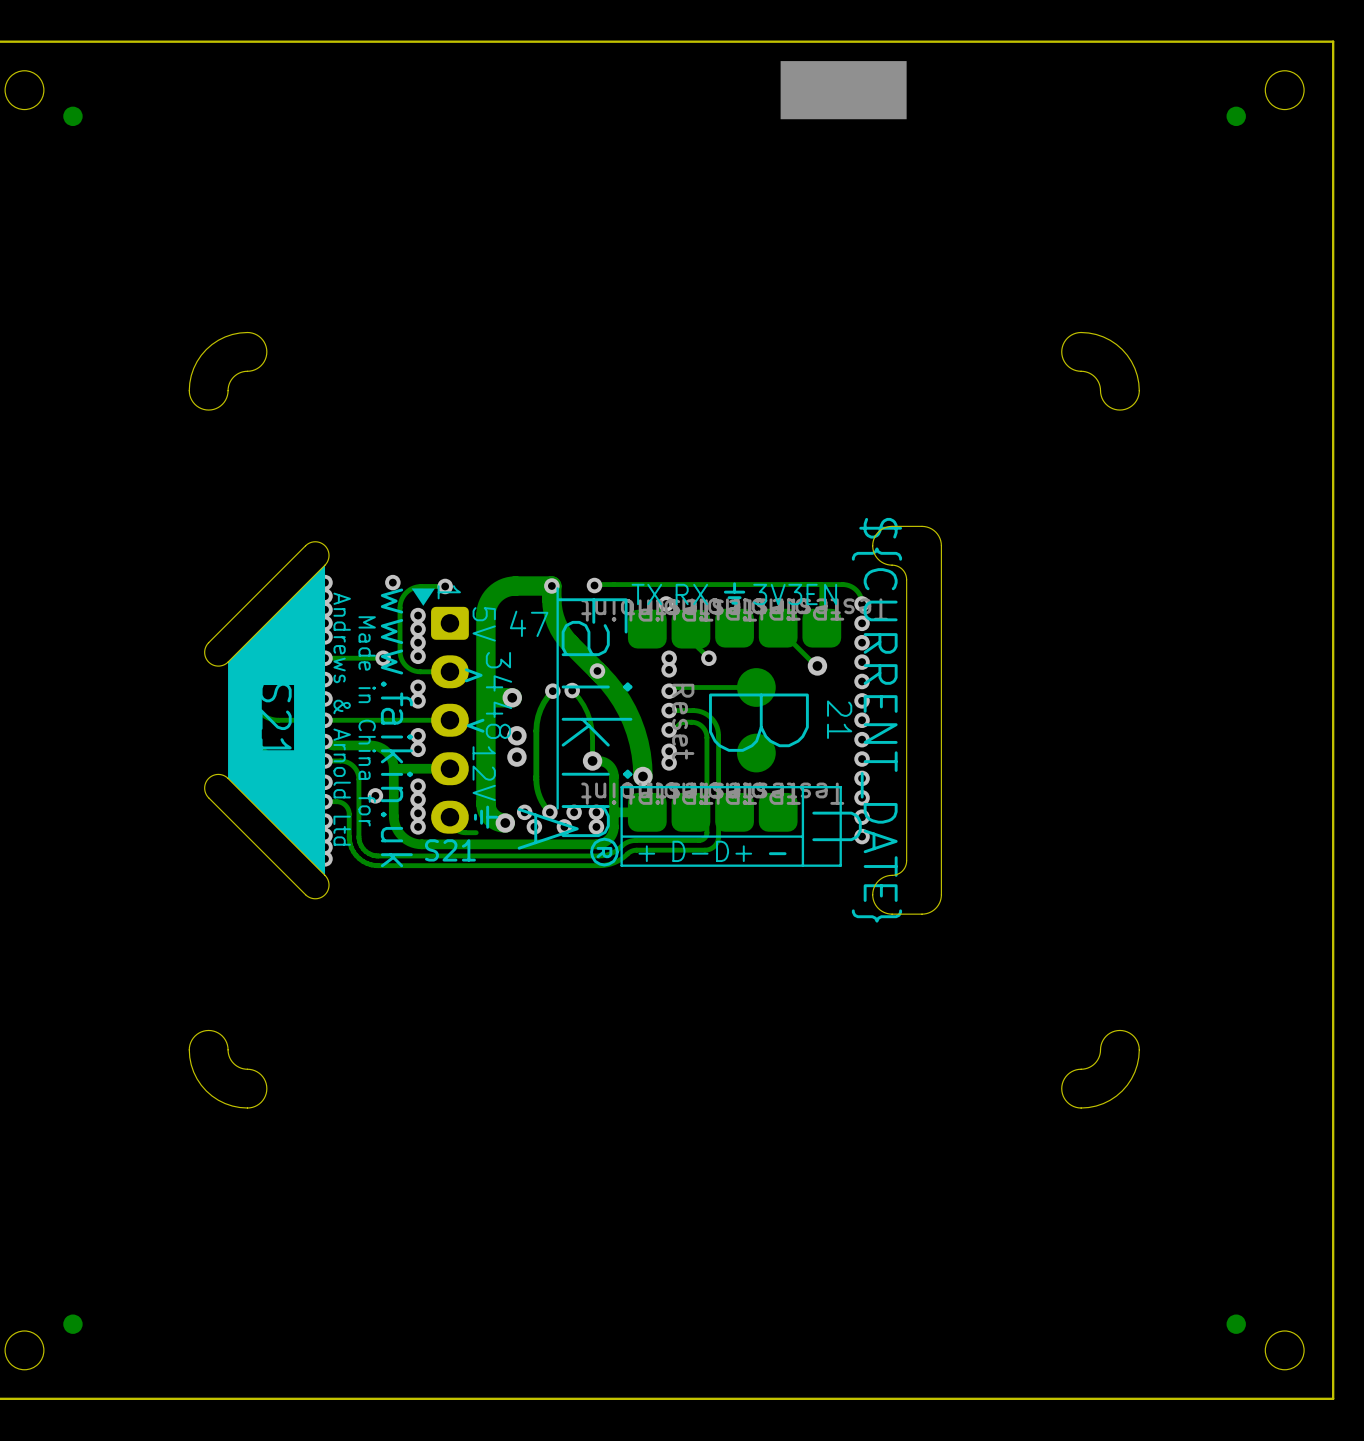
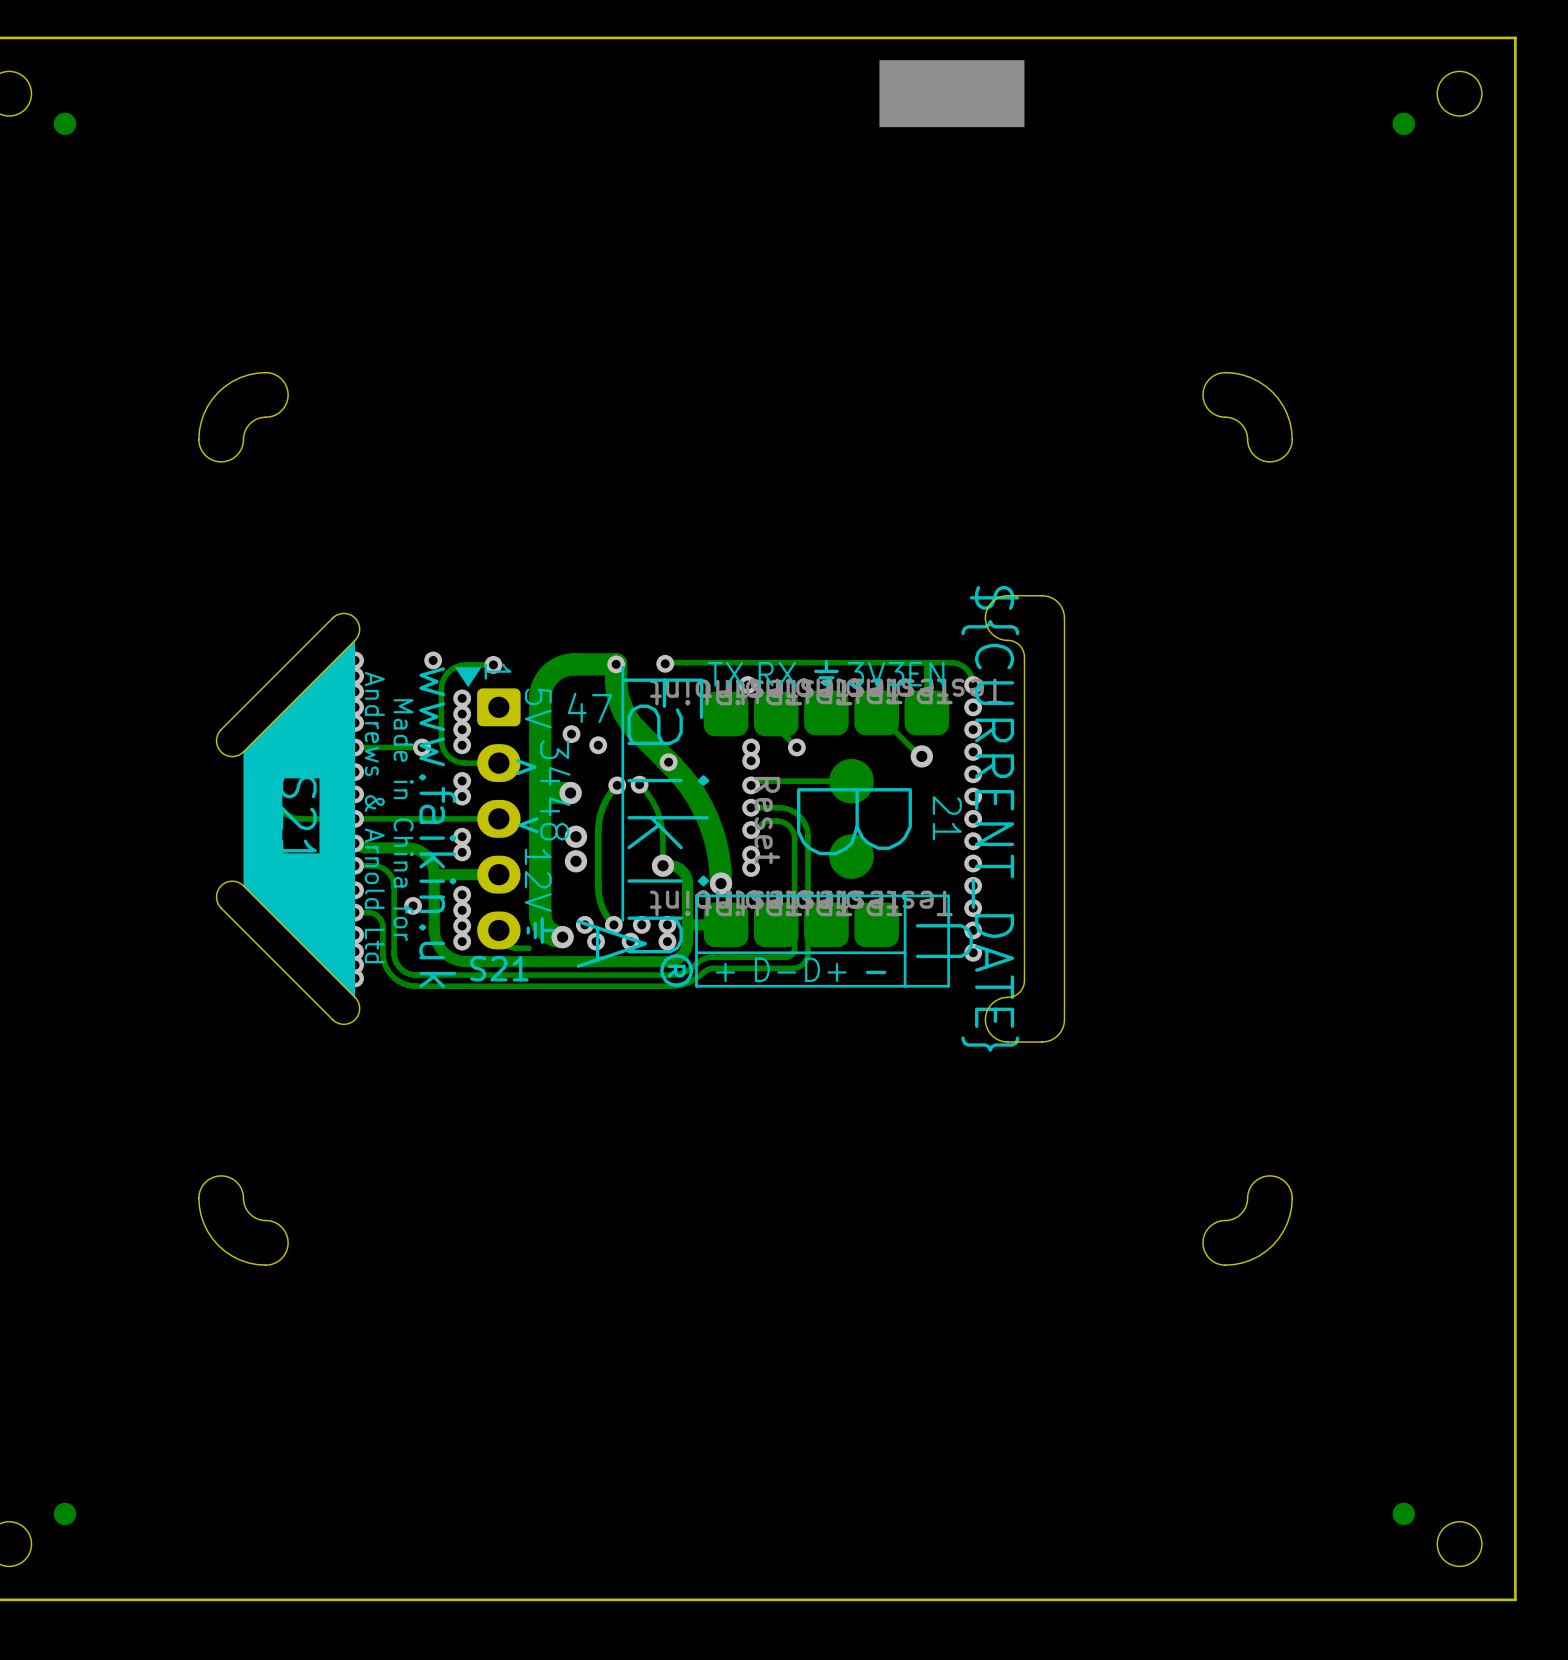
via: none -> (571, 734)
via: none -> (598, 745)

